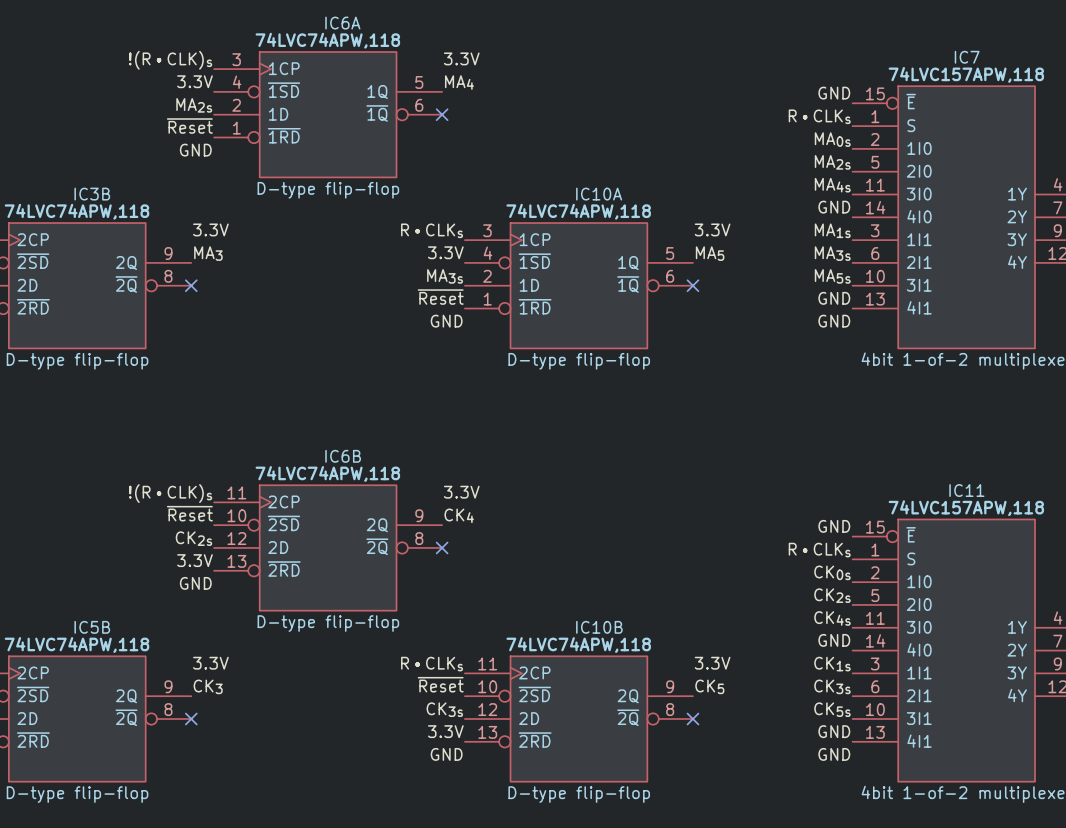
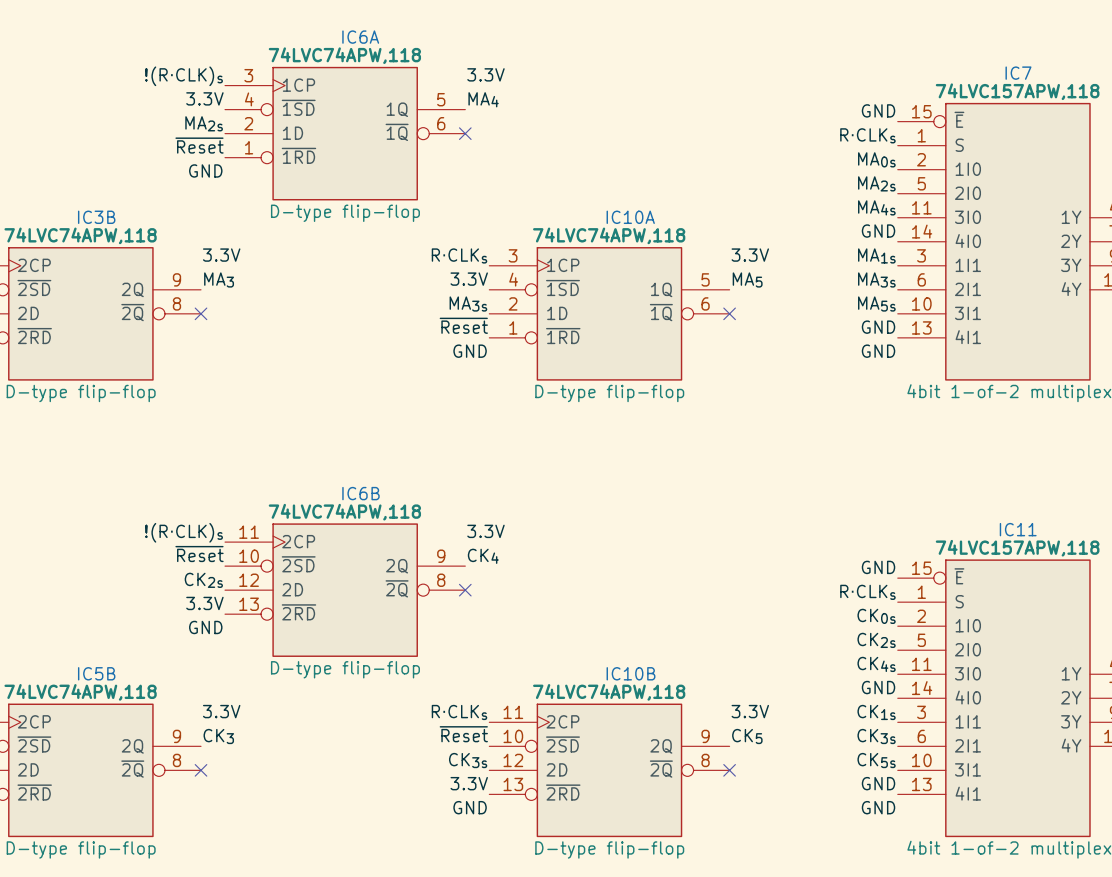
label: !(R•CLK)s (170, 60) -> !(R⋅CLK)s (184, 76)
label: R•CLKs (819, 116) -> R⋅CLKs (867, 135)
label: R•CLKs (432, 230) -> R⋅CLKs (459, 255)
label: !(R•CLK)s (170, 493) -> !(R⋅CLK)s (184, 532)
label: R•CLKs (819, 550) -> R⋅CLKs (867, 592)
label: R•CLKs (432, 664) -> R⋅CLKs (459, 712)

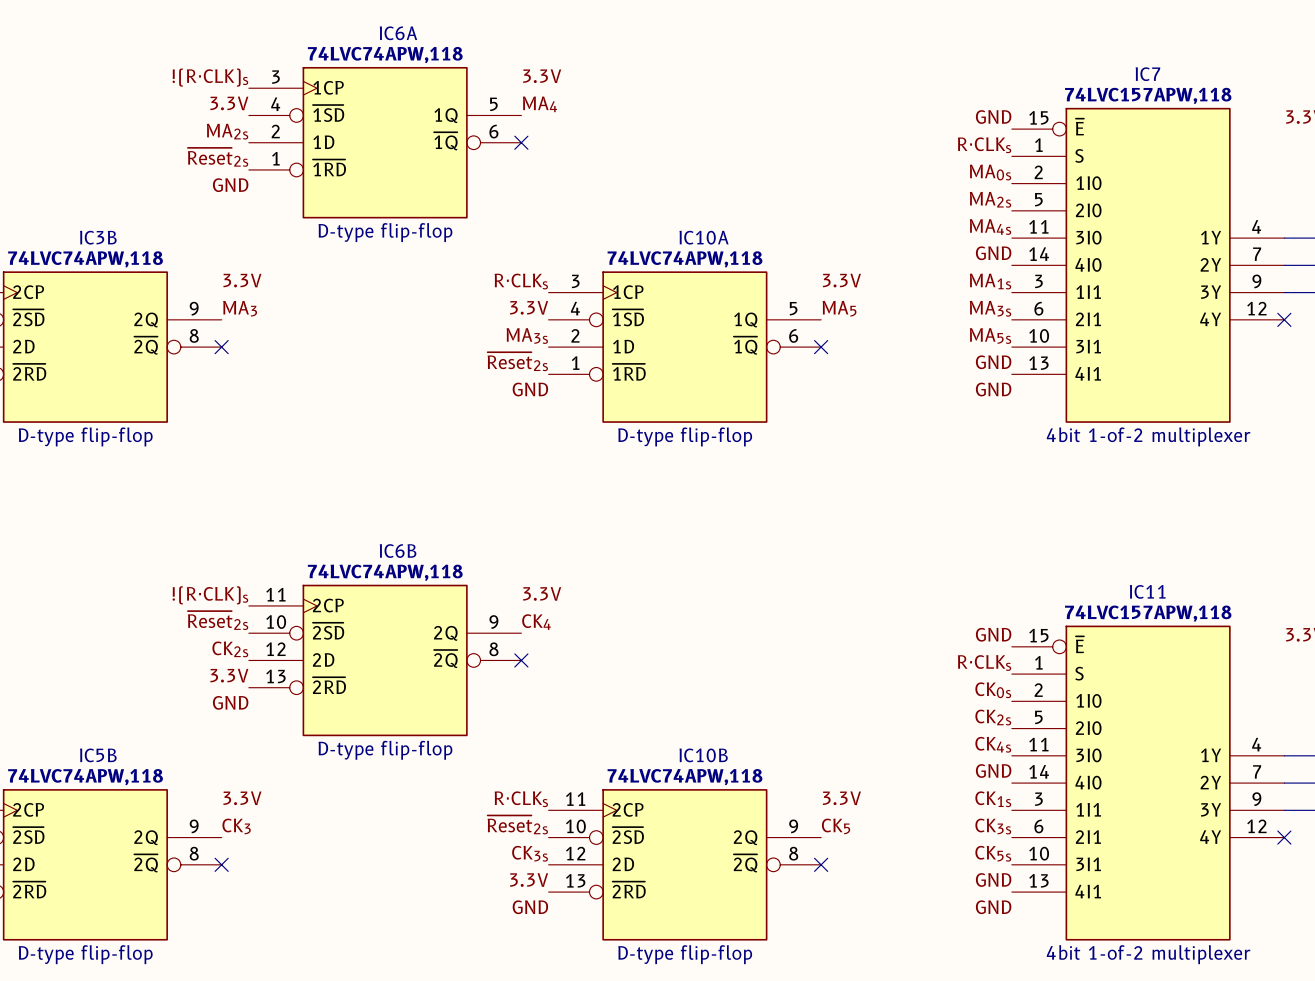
label: ~{Reset} (199, 145) -> ~{Reset}2s (218, 157)
label: ~{Reset} (463, 325) -> ~{Reset}2s (517, 361)
label: ~{Reset} (199, 554) -> ~{Reset}2s (218, 620)
label: ~{Reset} (463, 734) -> ~{Reset}2s (517, 824)

